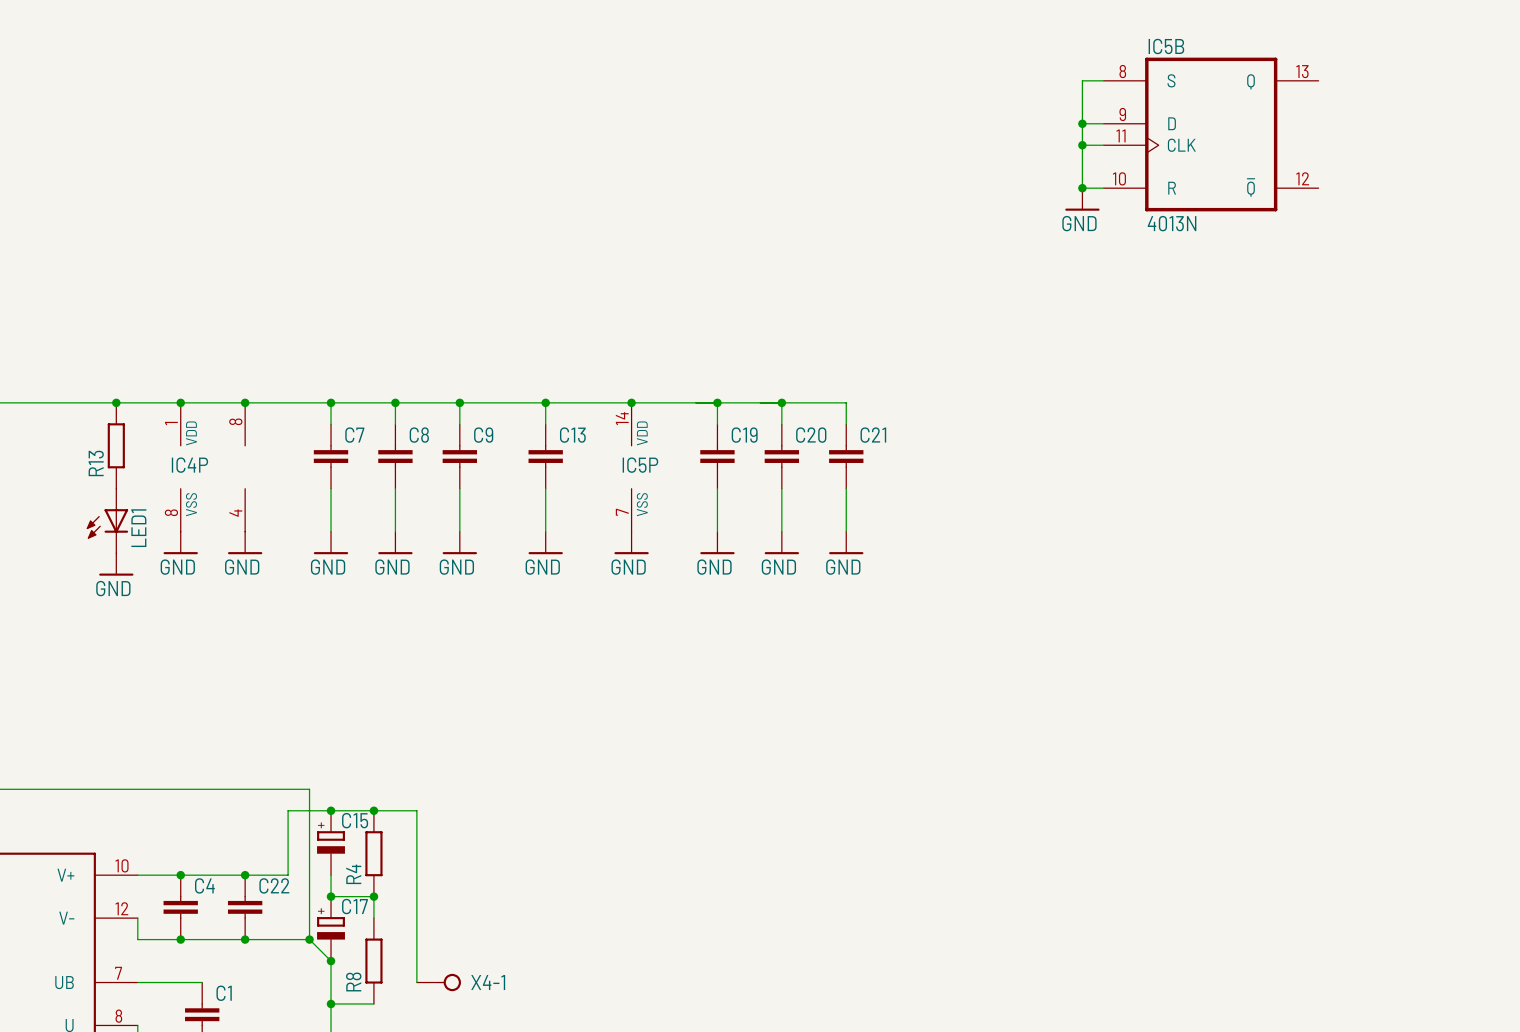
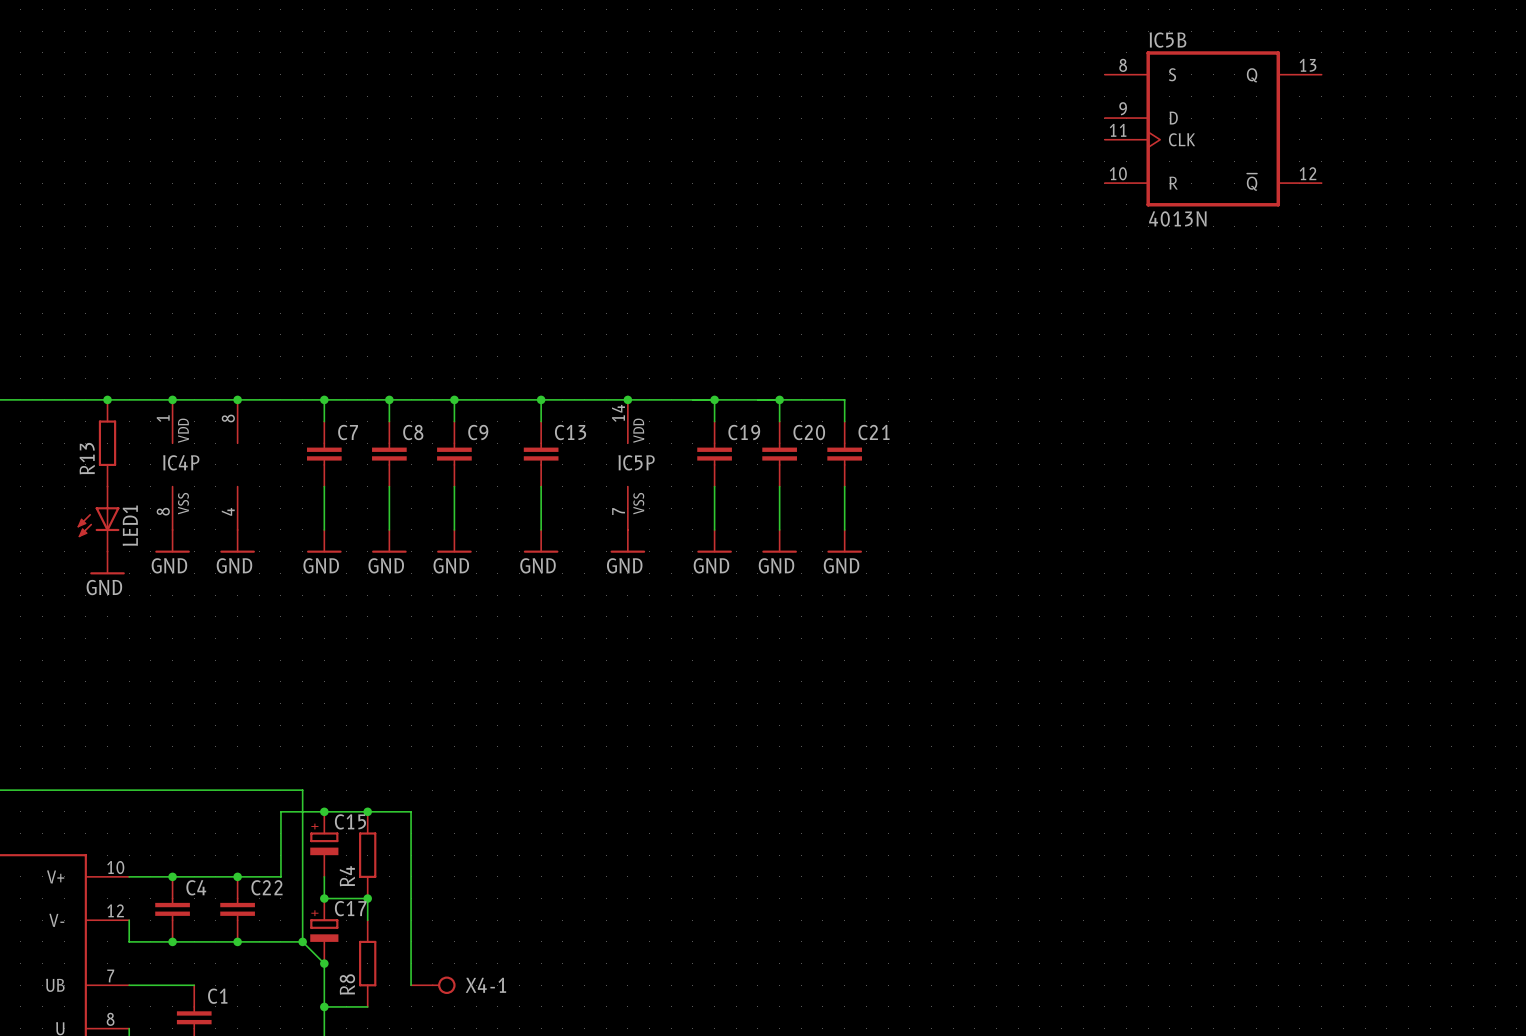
wire: (1103, 80) (1082, 80) (1082, 188) (1103, 188) -> none
wire: (1082, 123) (1103, 123) -> none
junction: (1082, 123) -> none
wire: (1082, 145) (1103, 145) -> none
junction: (1082, 145) -> none
junction: (1082, 188) -> none
power symbol: GND (1082, 199) -> none

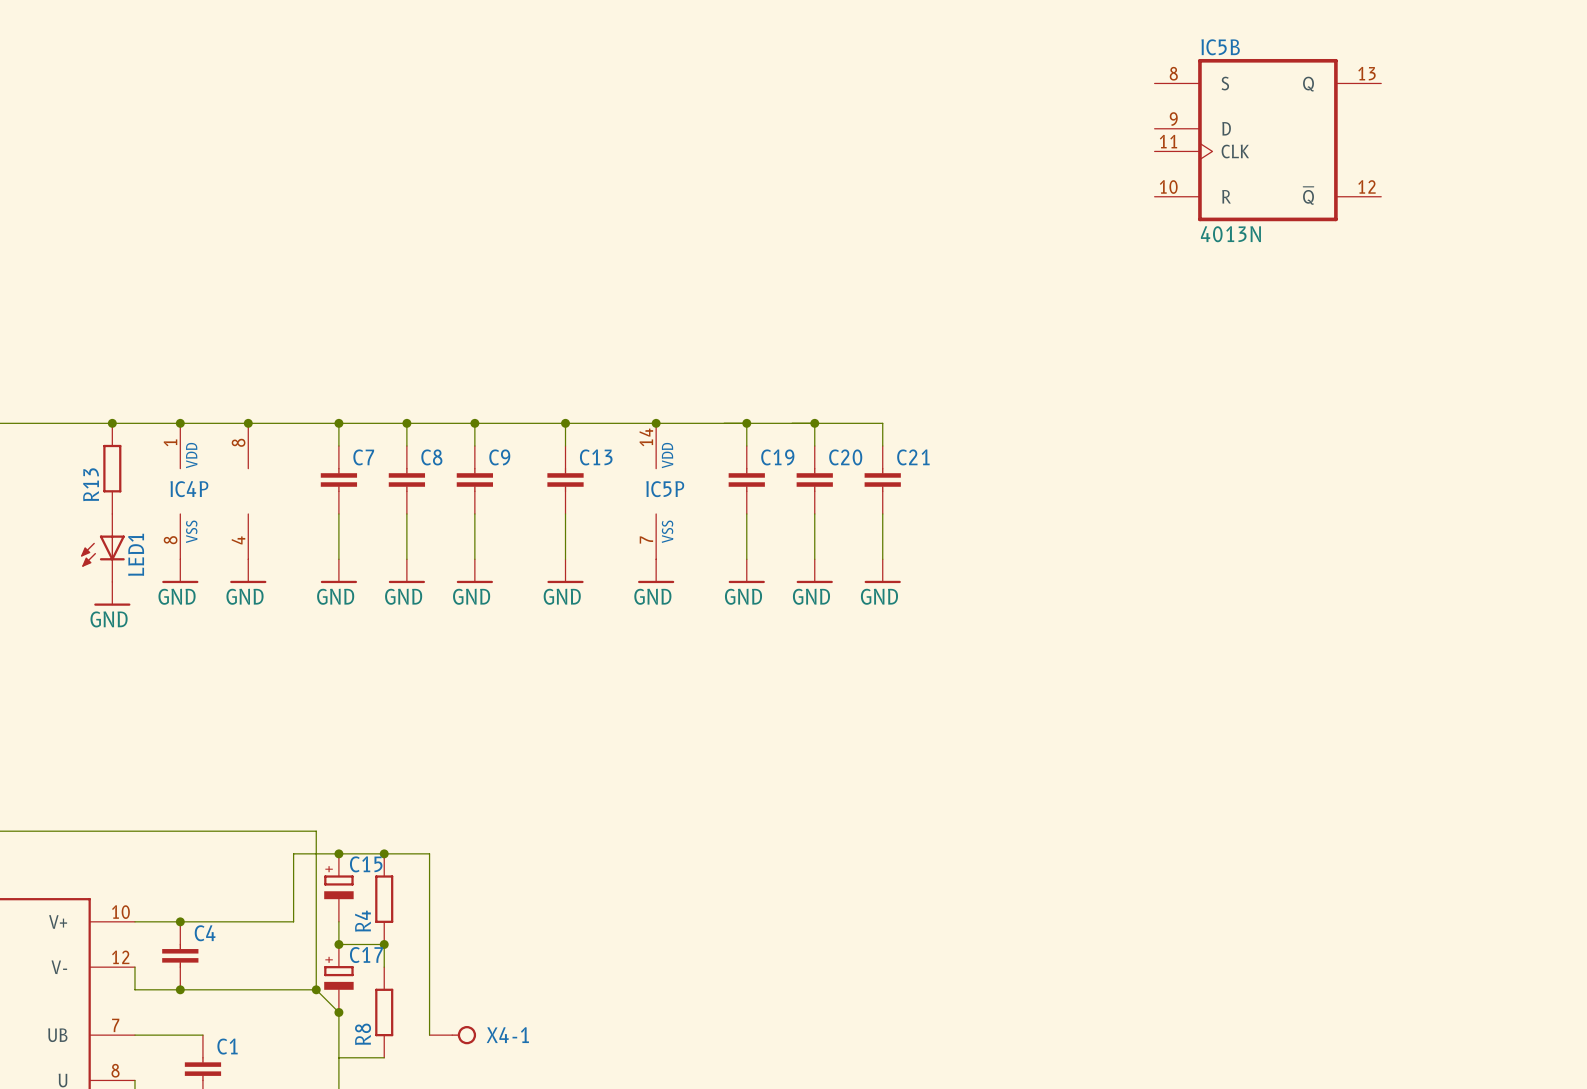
junction: (237, 876) -> none
C22: (237, 909) -> none
junction: (237, 941) -> none
junction: (324, 1006) -> none

